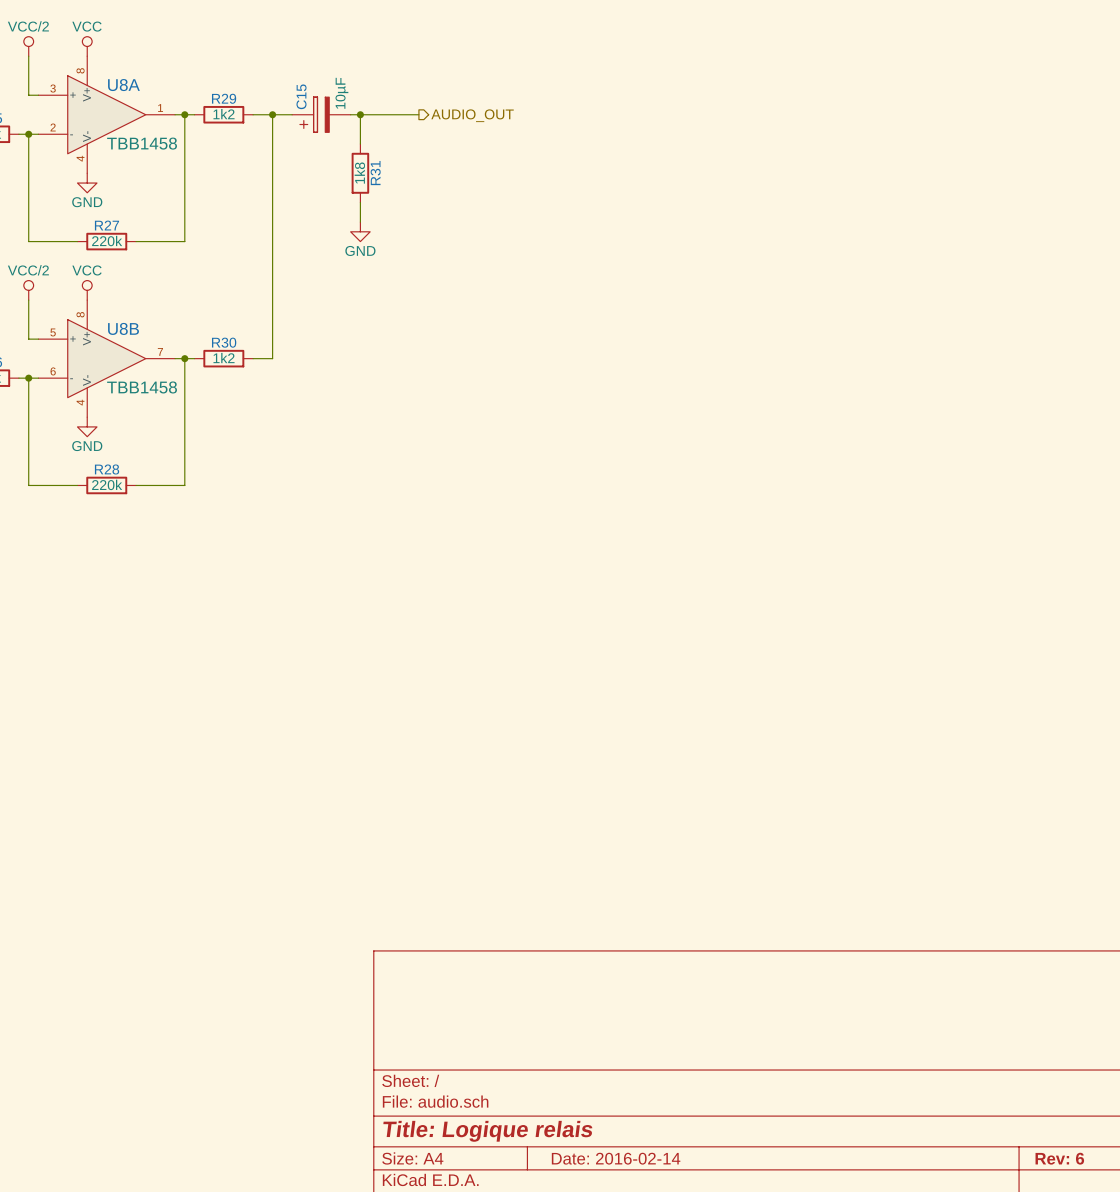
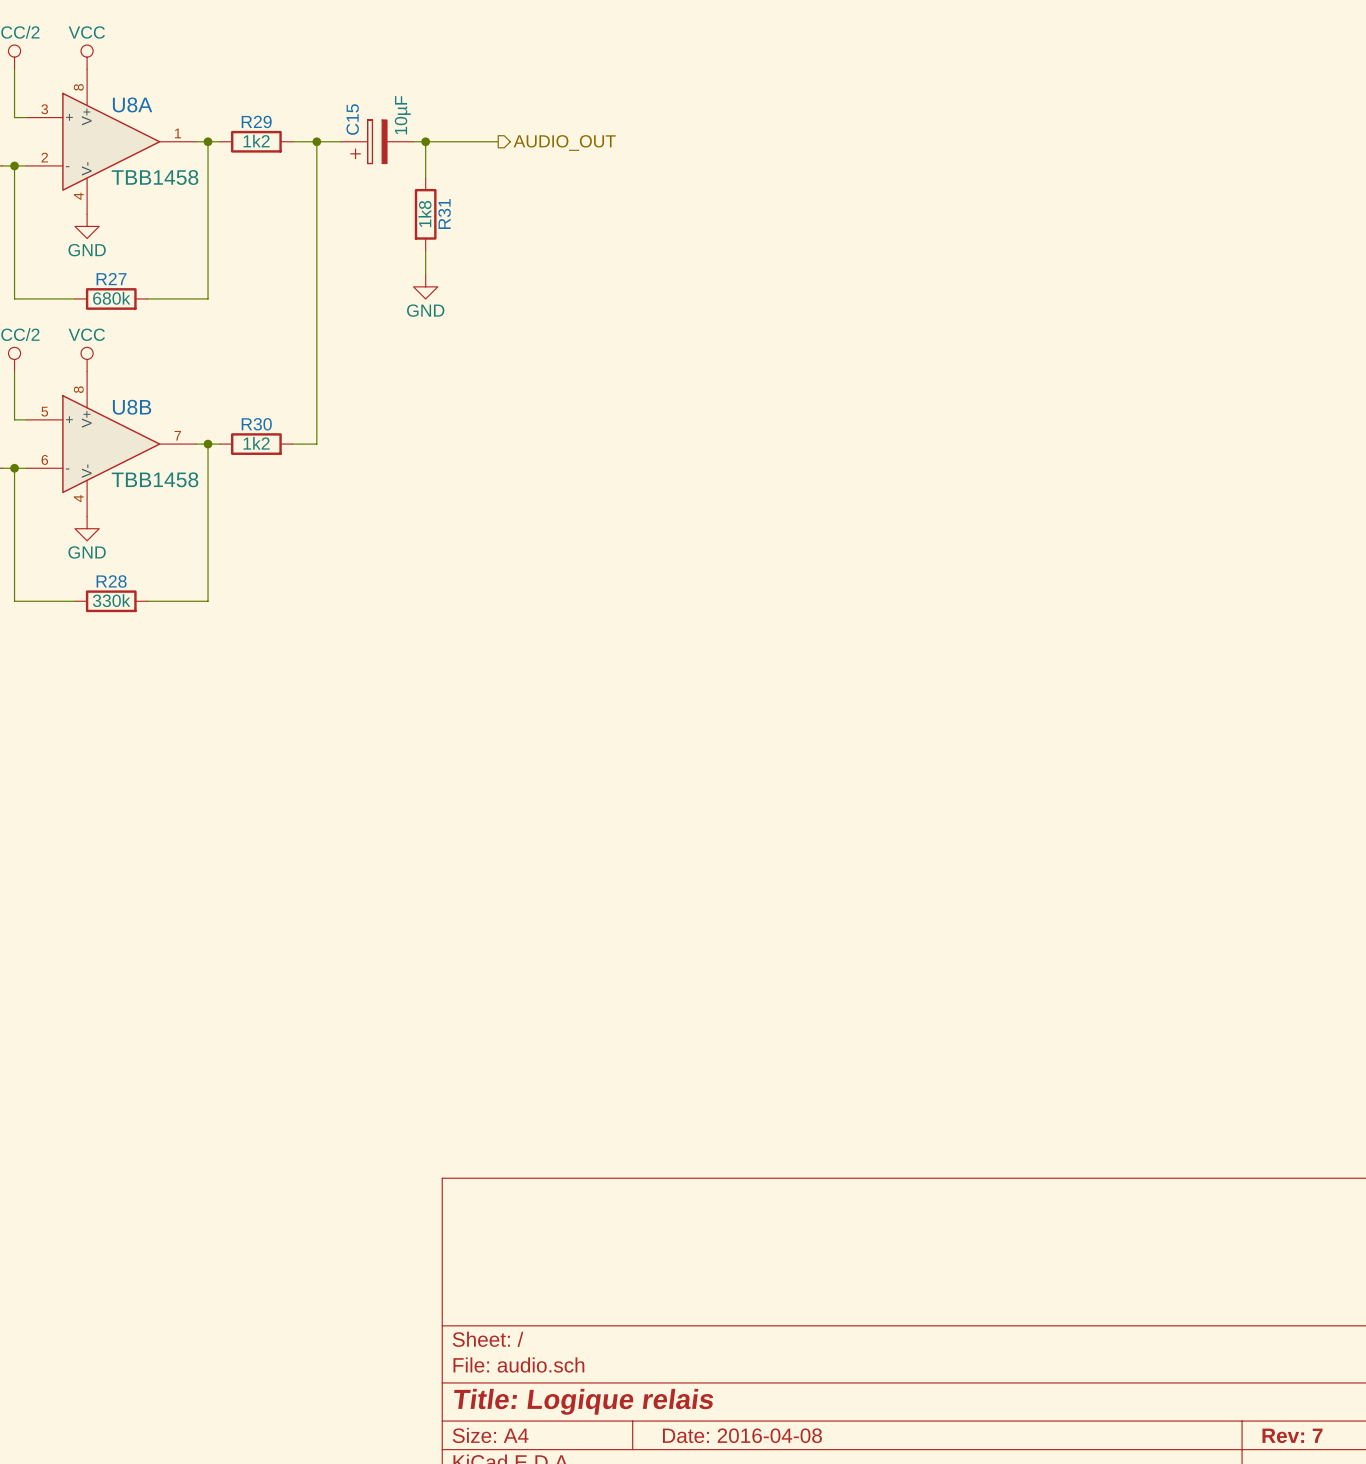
R27 value: 220k (107, 241) -> 680k (111, 298)
R28 value: 220k (107, 484) -> 330k (111, 600)
title block: Date: 2016-02-14 (616, 1158) -> Date: 2016-04-08 (742, 1435)
title block: Rev: 6 (1059, 1158) -> Rev: 7 (1292, 1435)

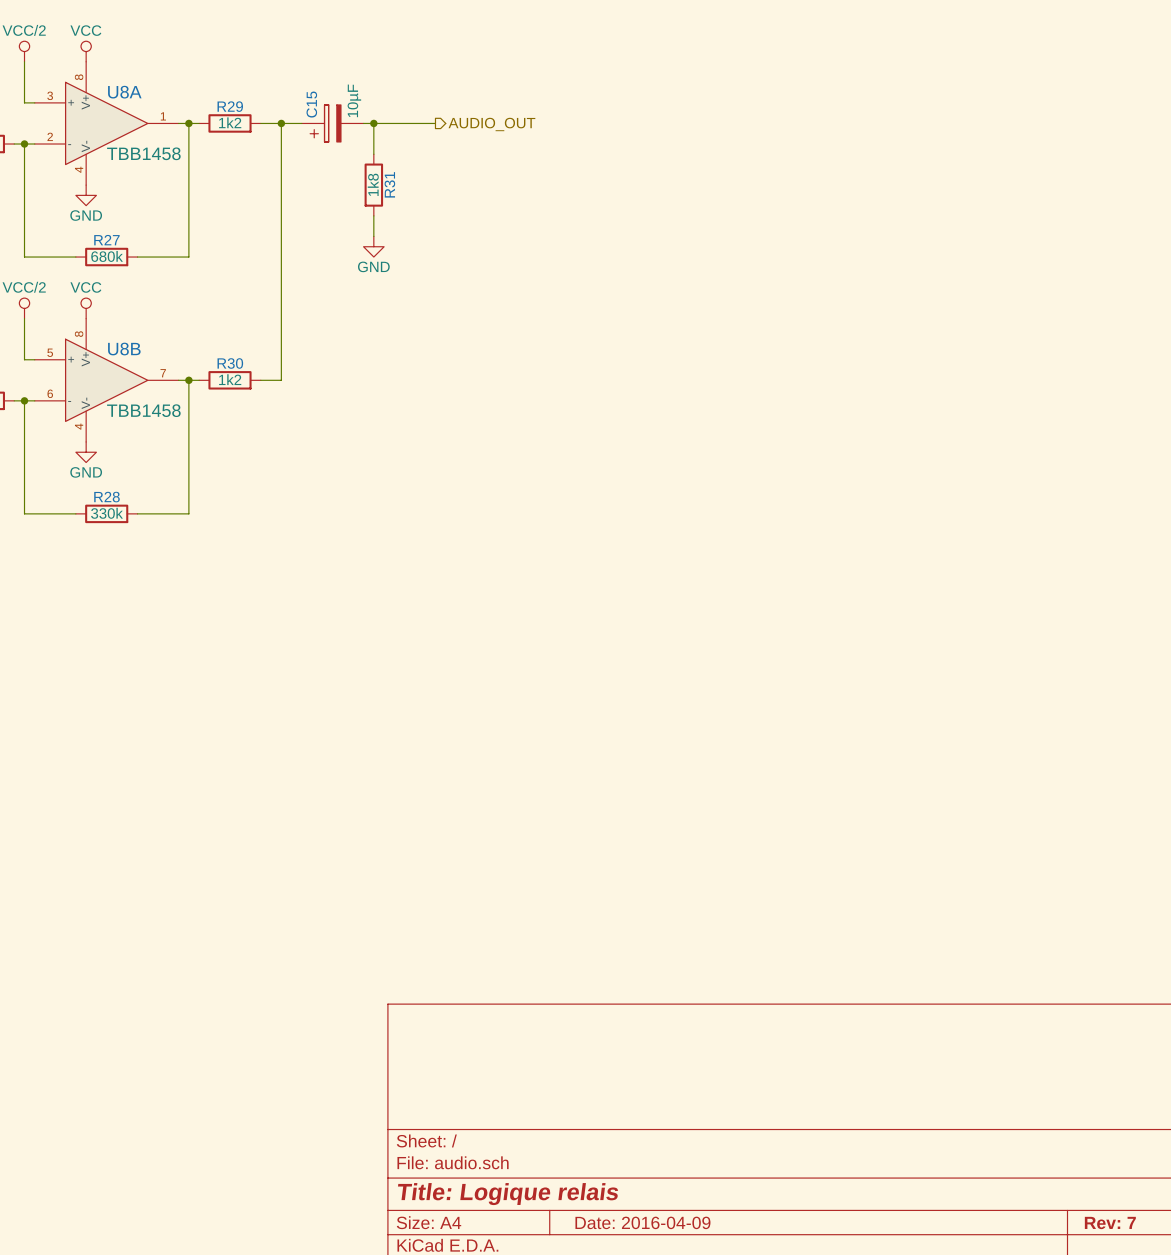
title block: Date: 2016-04-08 (742, 1435) -> Date: 2016-04-09 (642, 1222)

